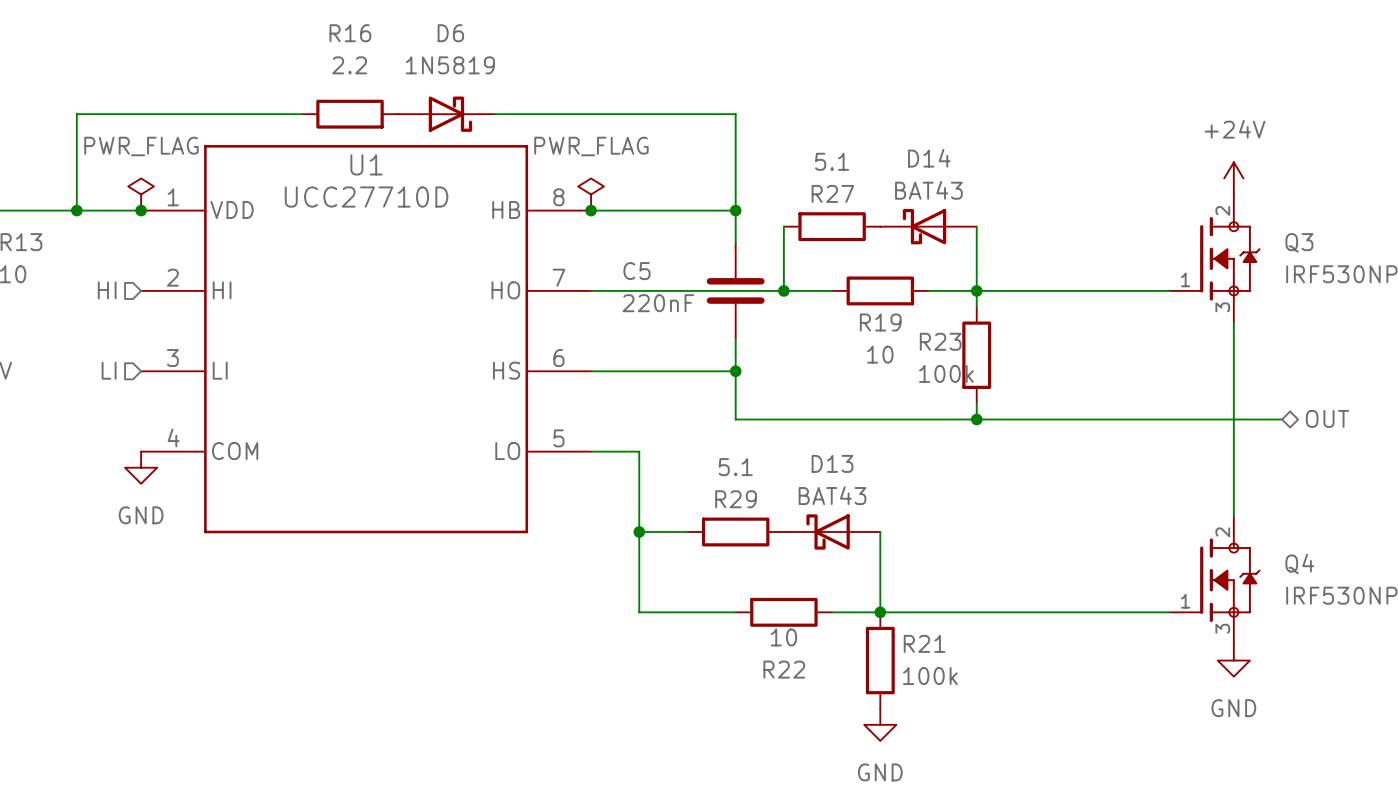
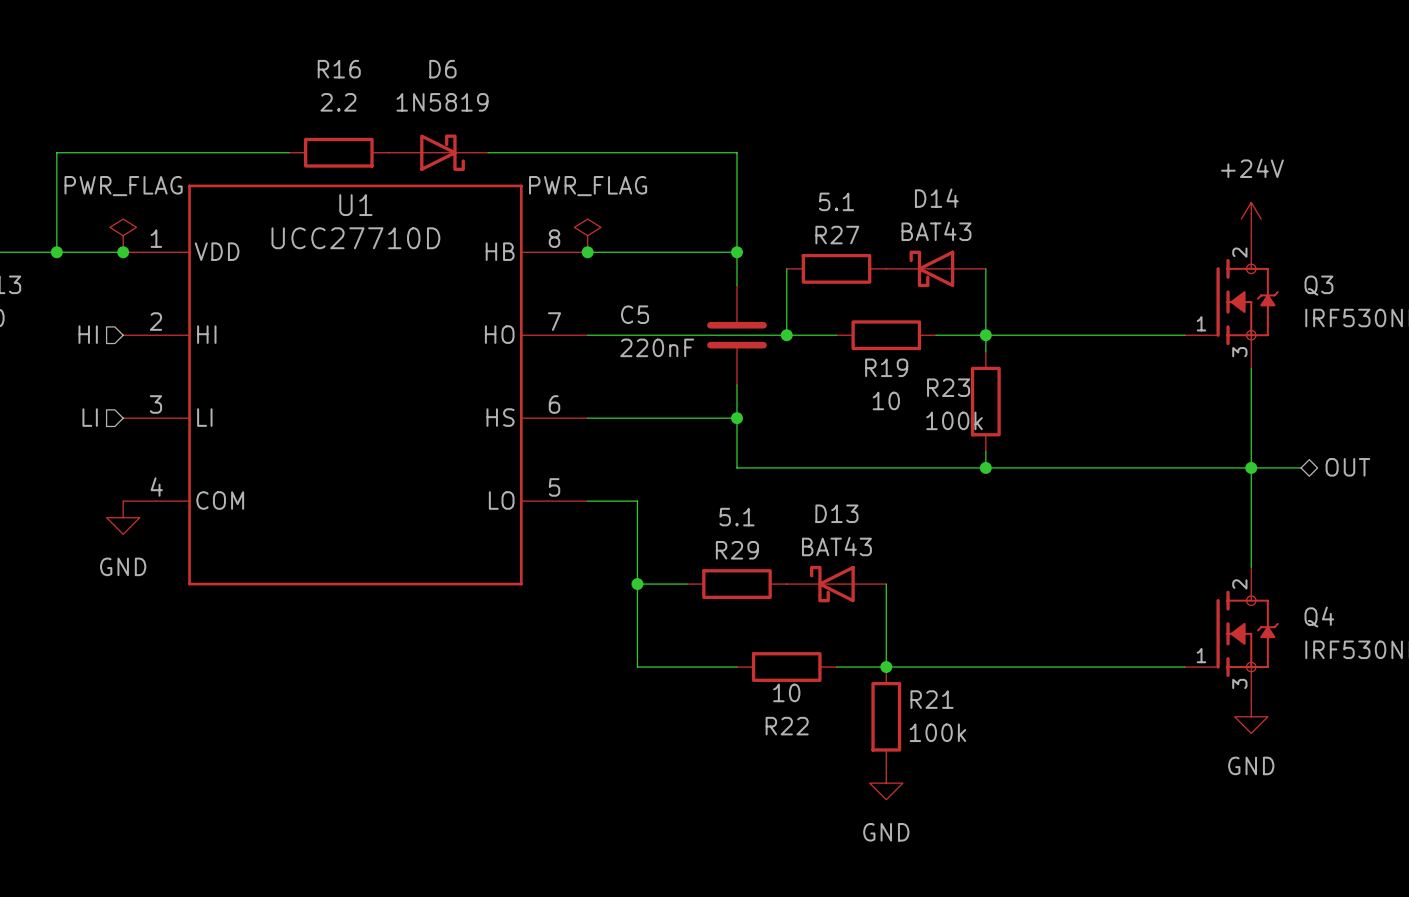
junction: none -> (1251, 467)

